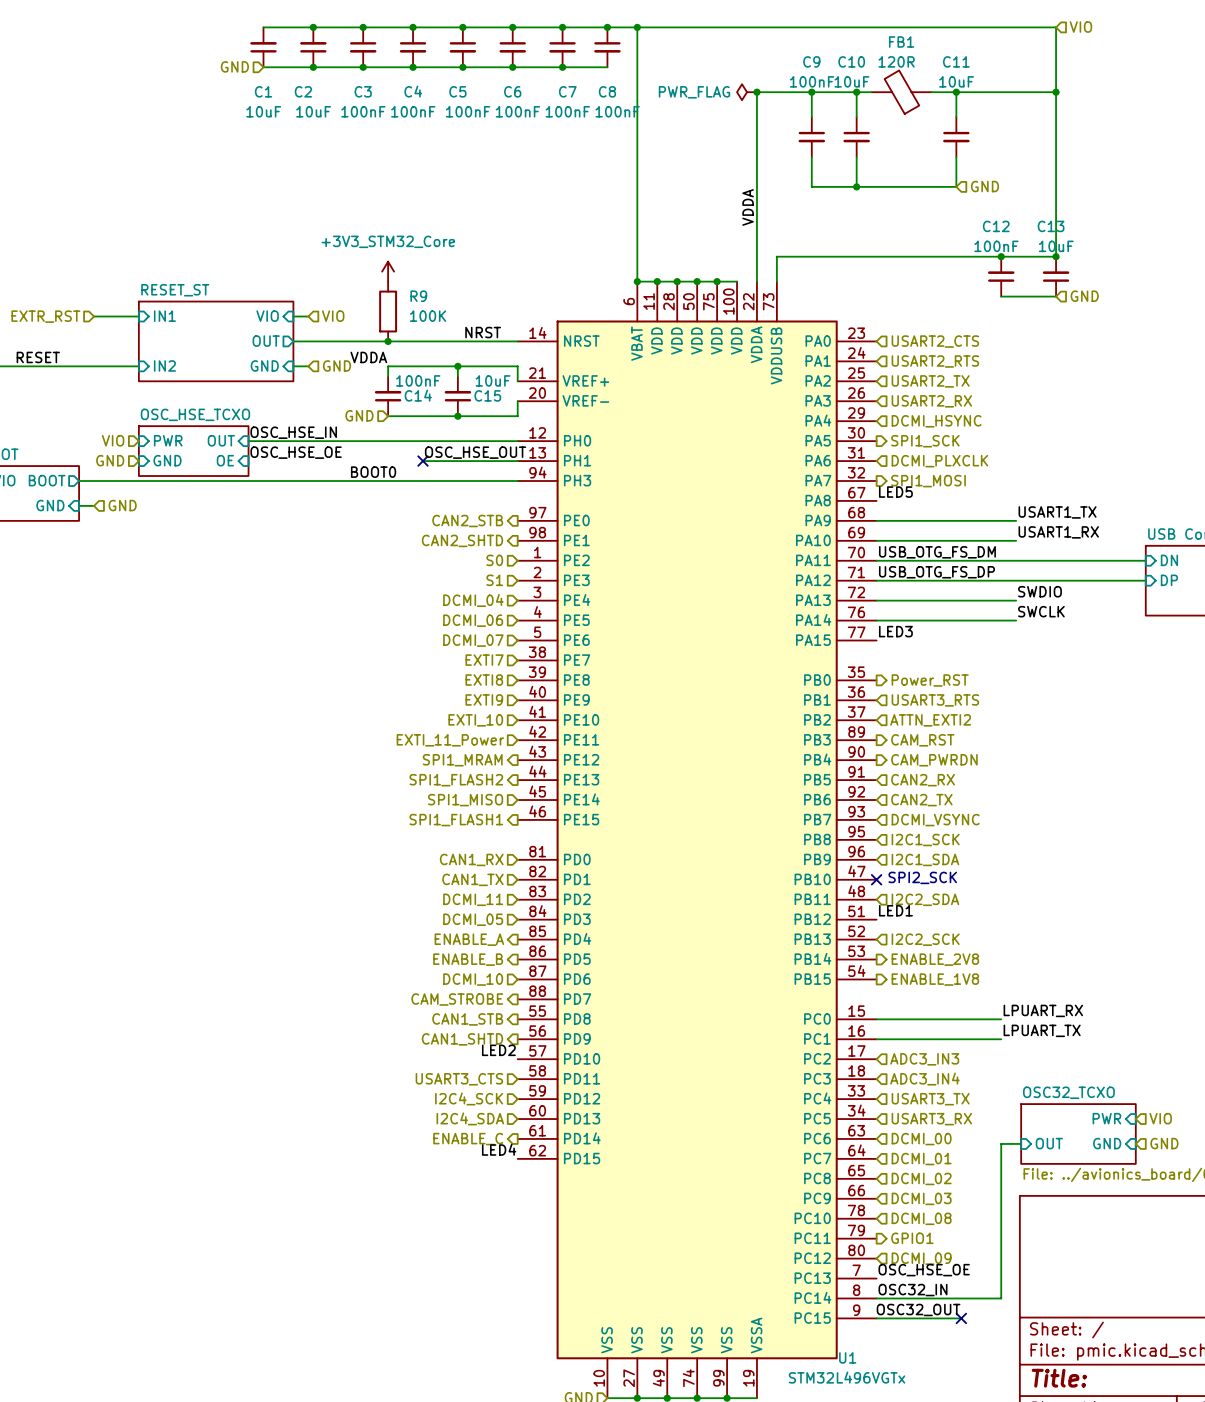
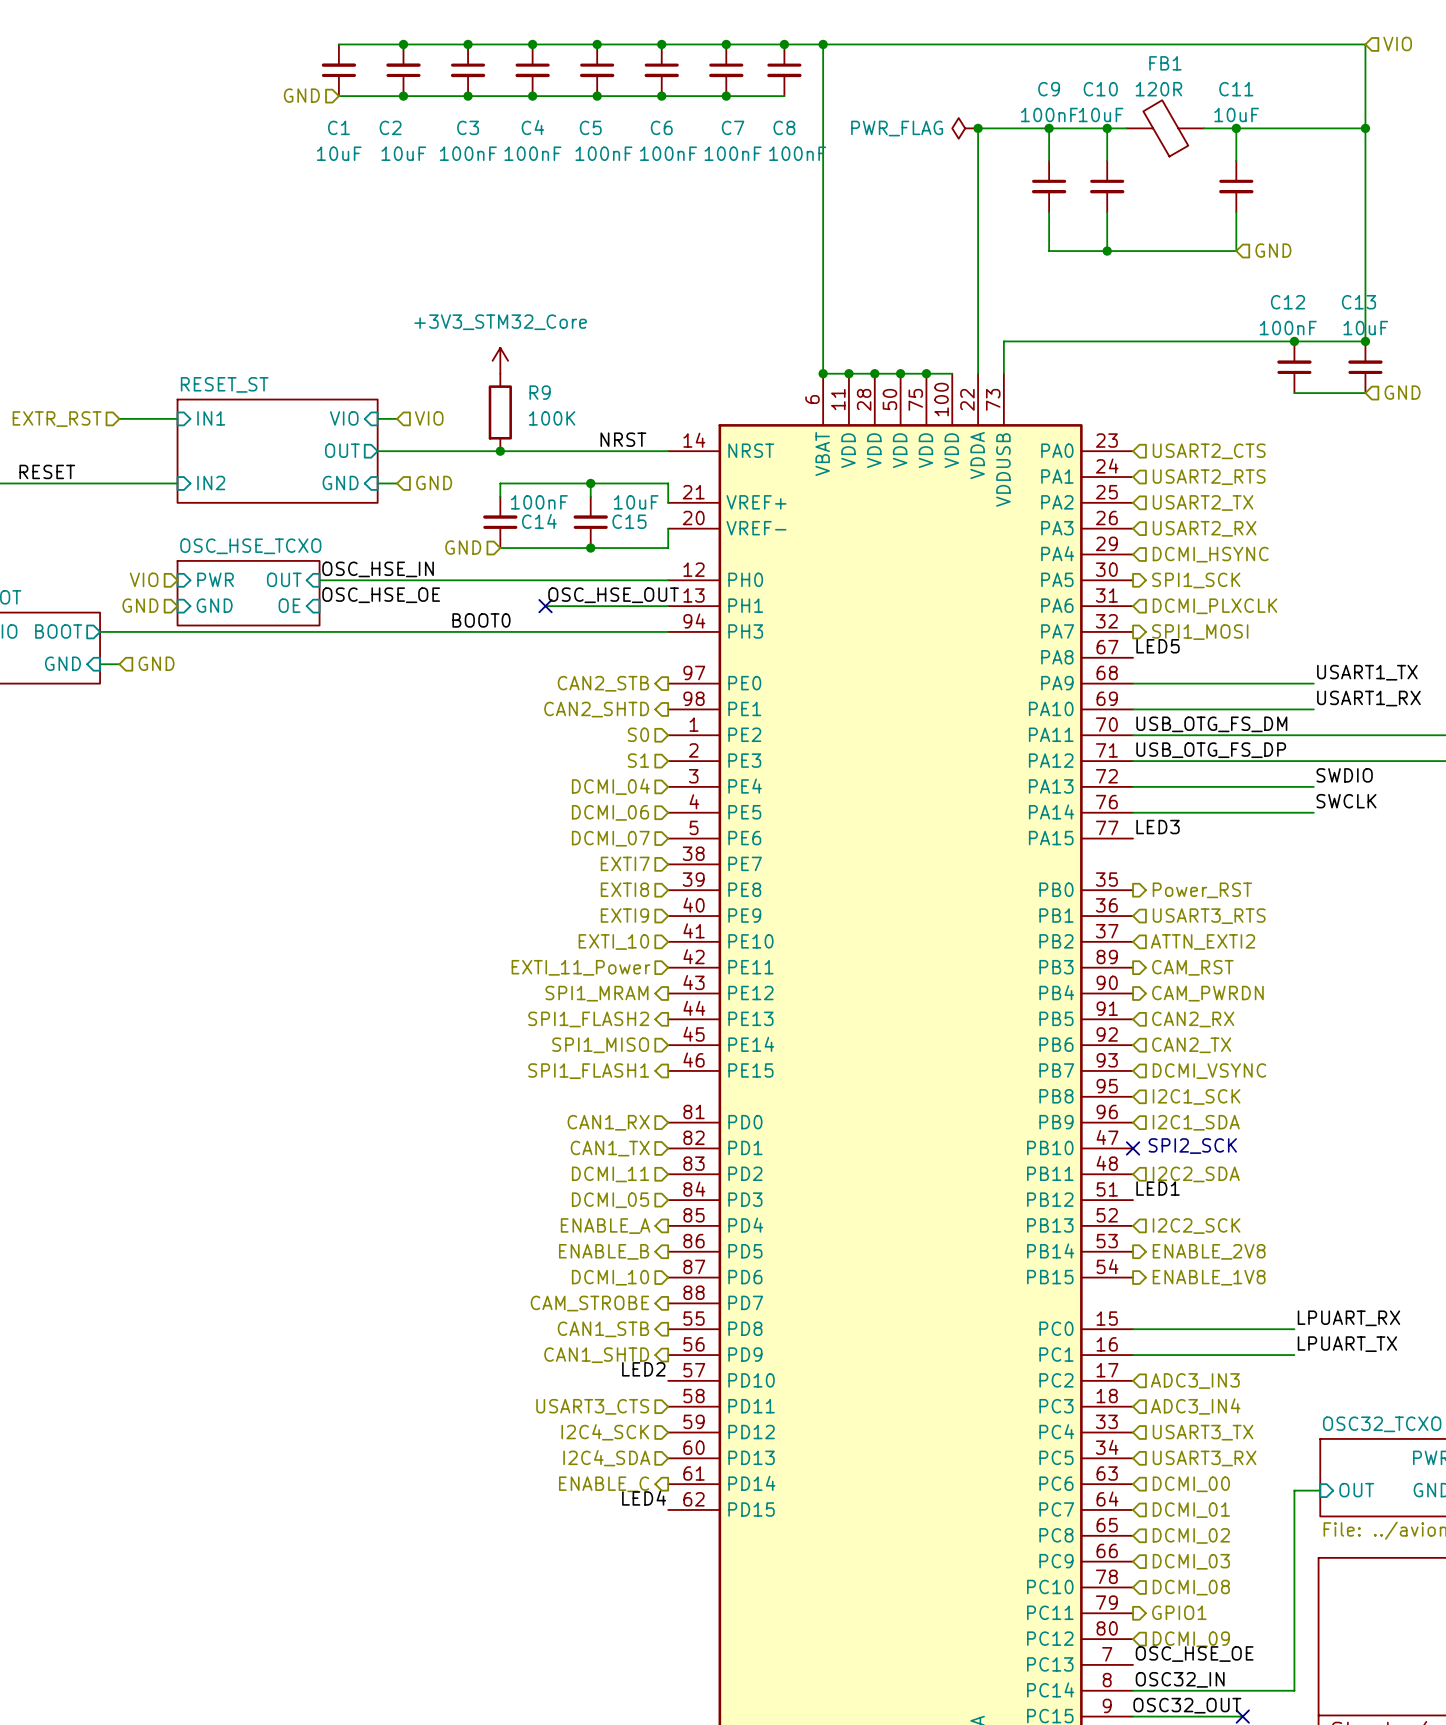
label: VDDA (748, 207) -> none
label: VDDA (368, 357) -> none

